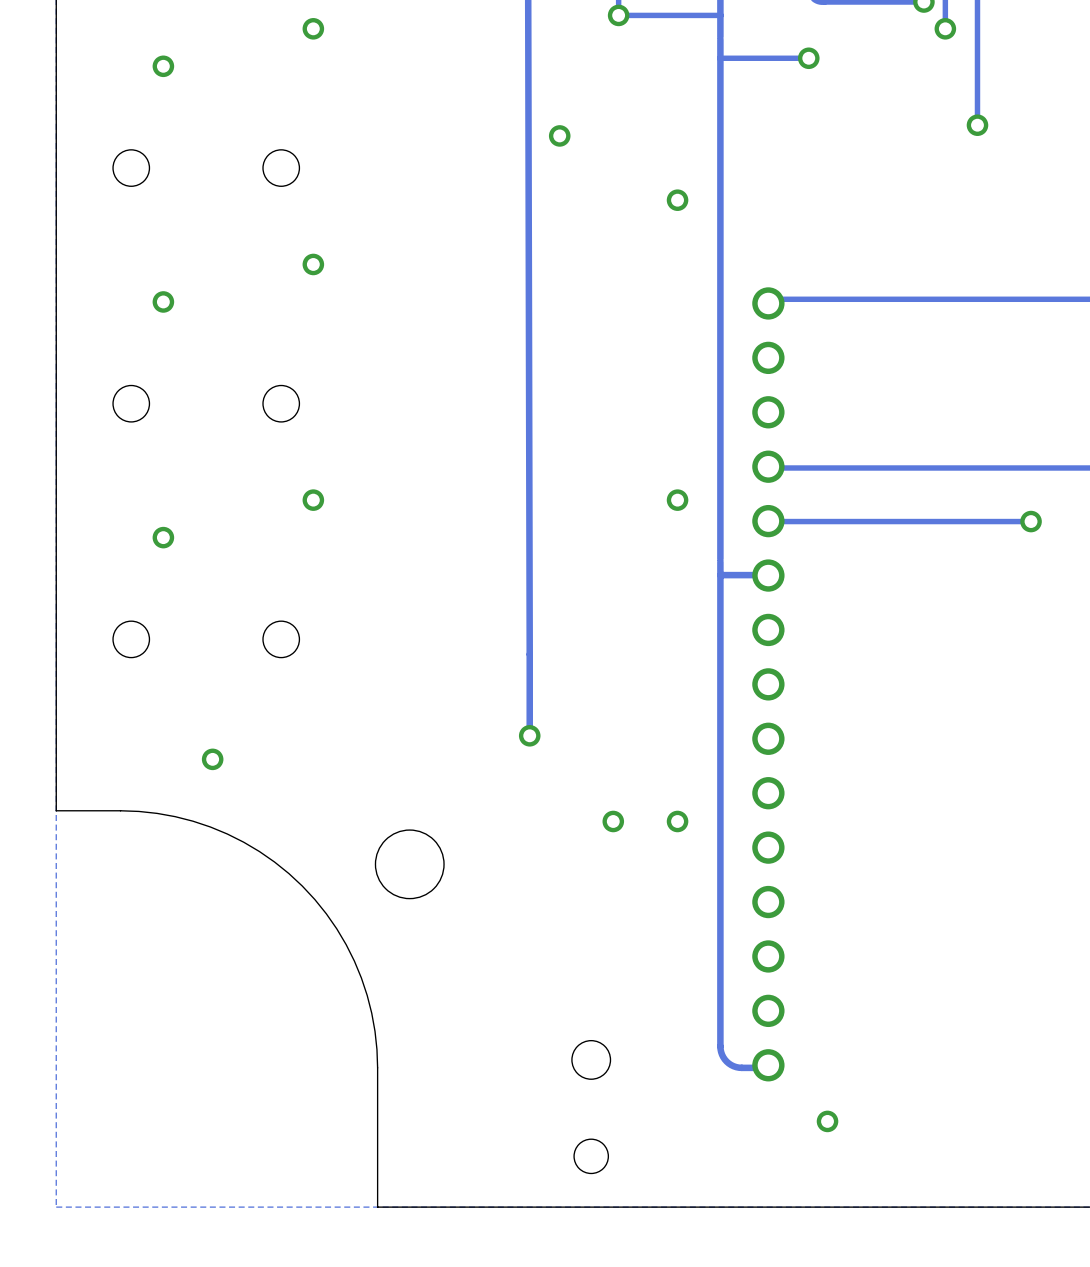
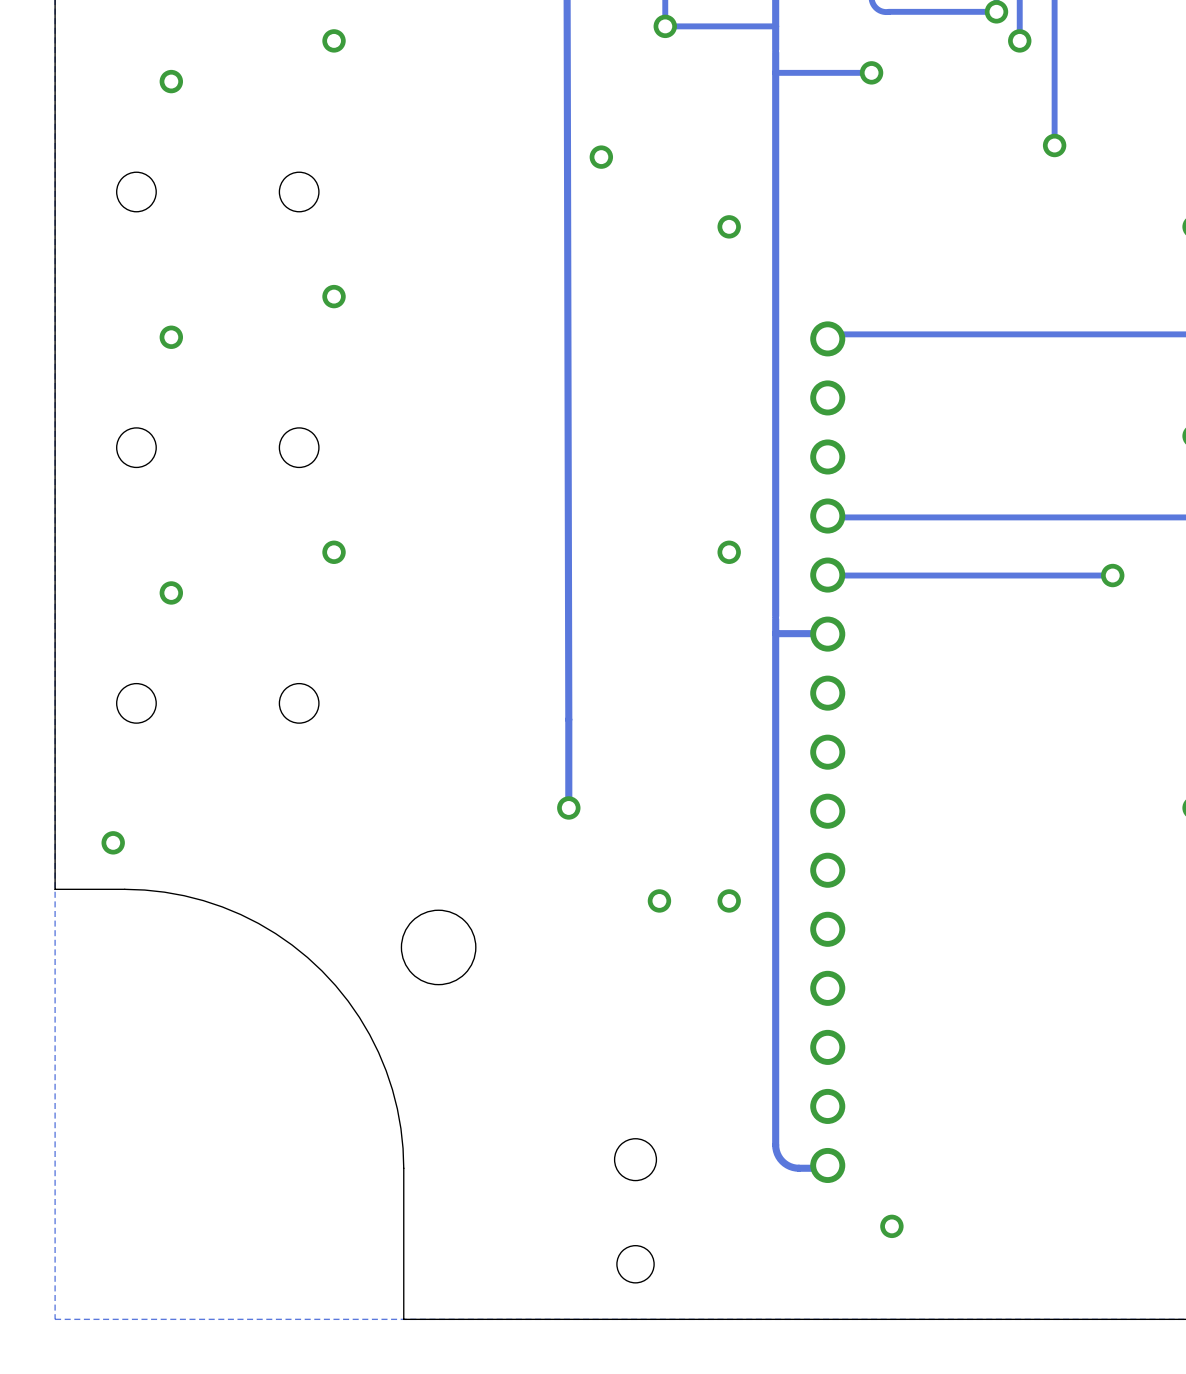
via position: (212, 759) -> (113, 842)

